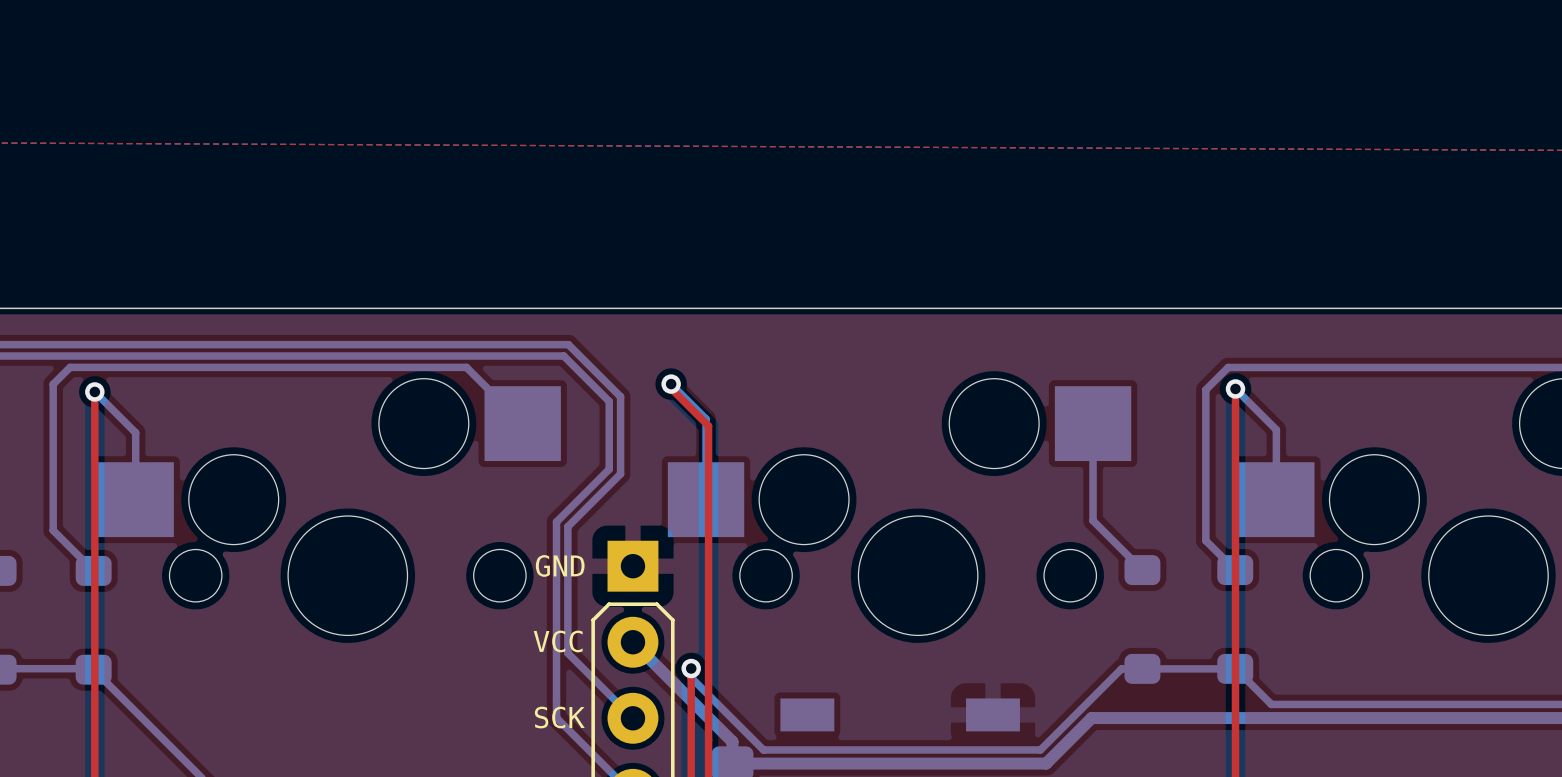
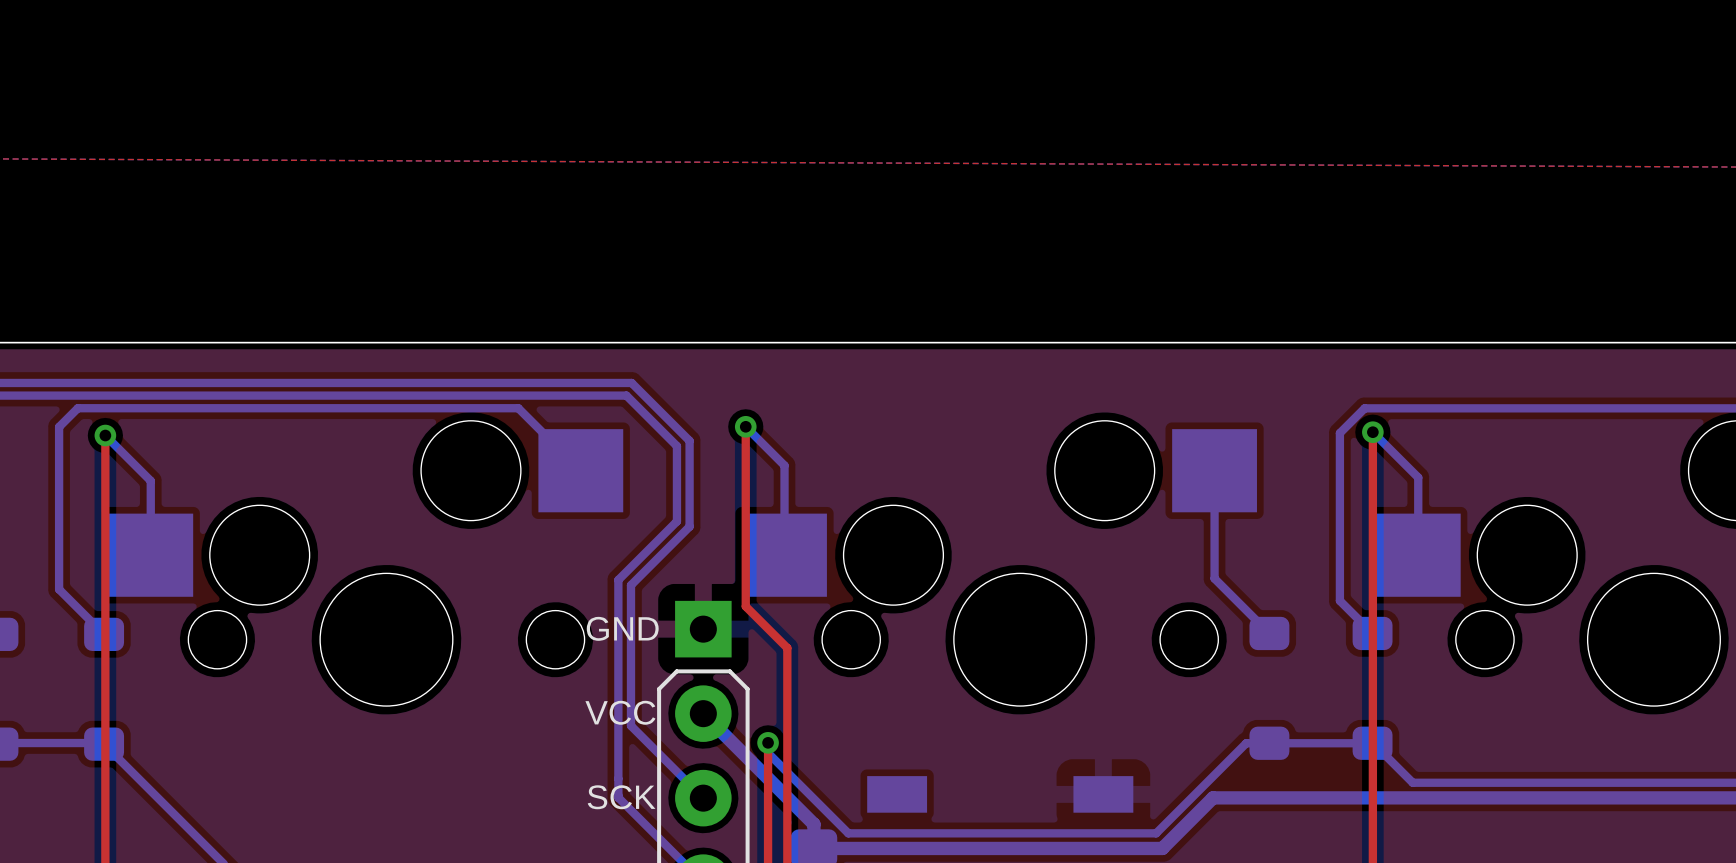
top track: (671, 388) (708, 426) (708, 583) -> (745, 431) (745, 606) (787, 648)

